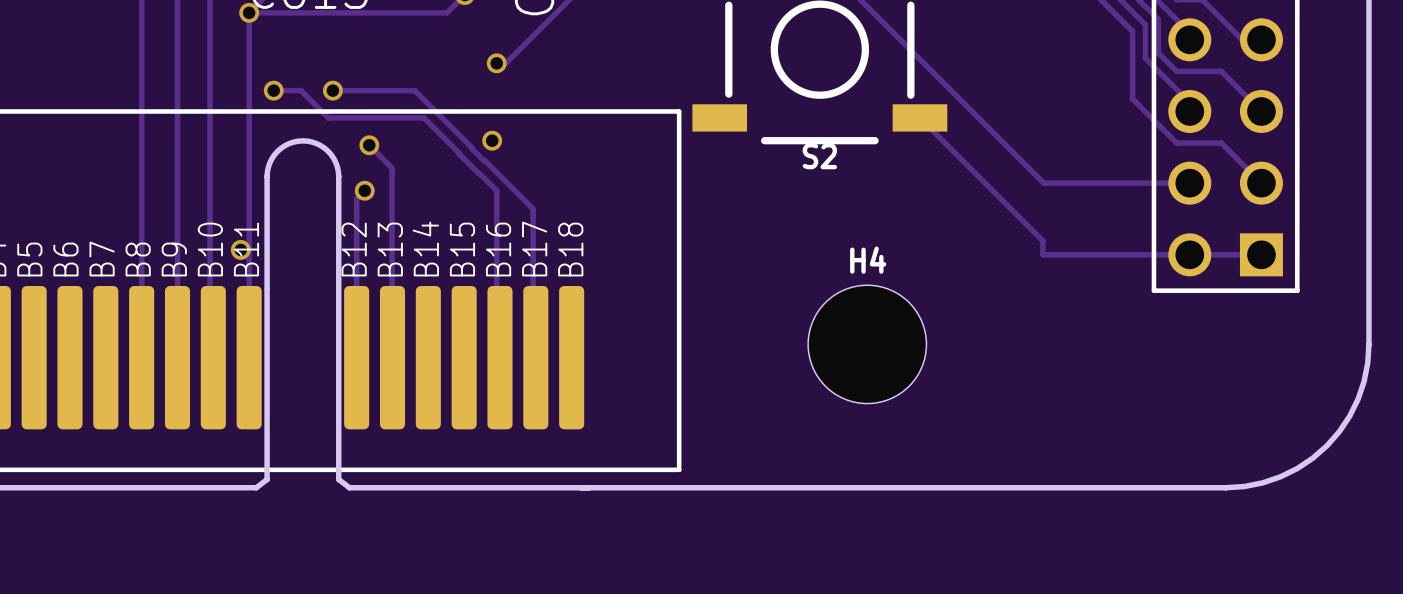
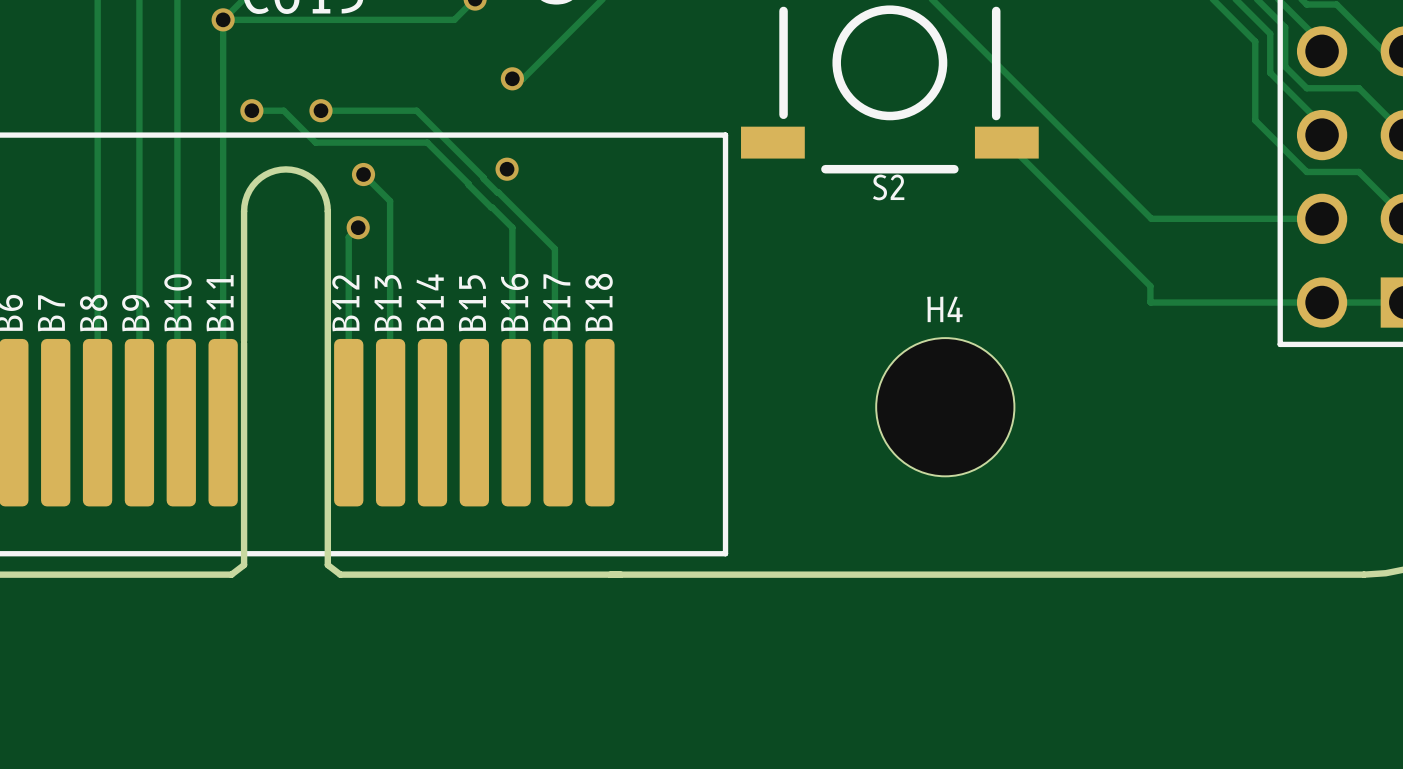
via: (240, 249) -> none

